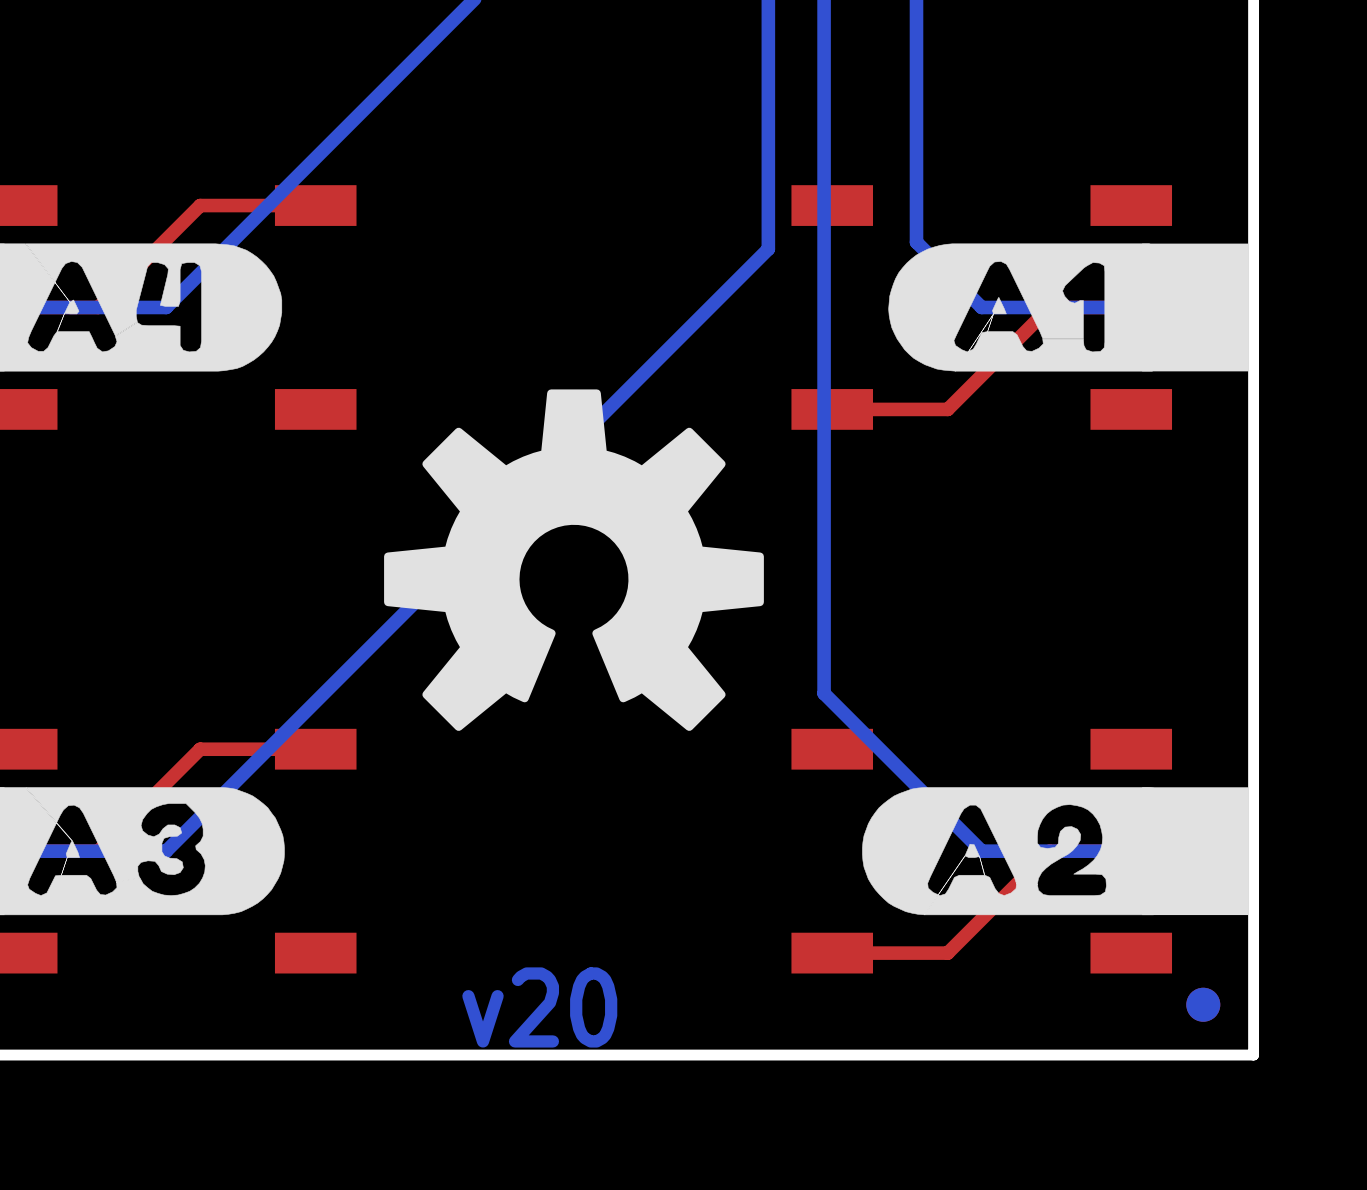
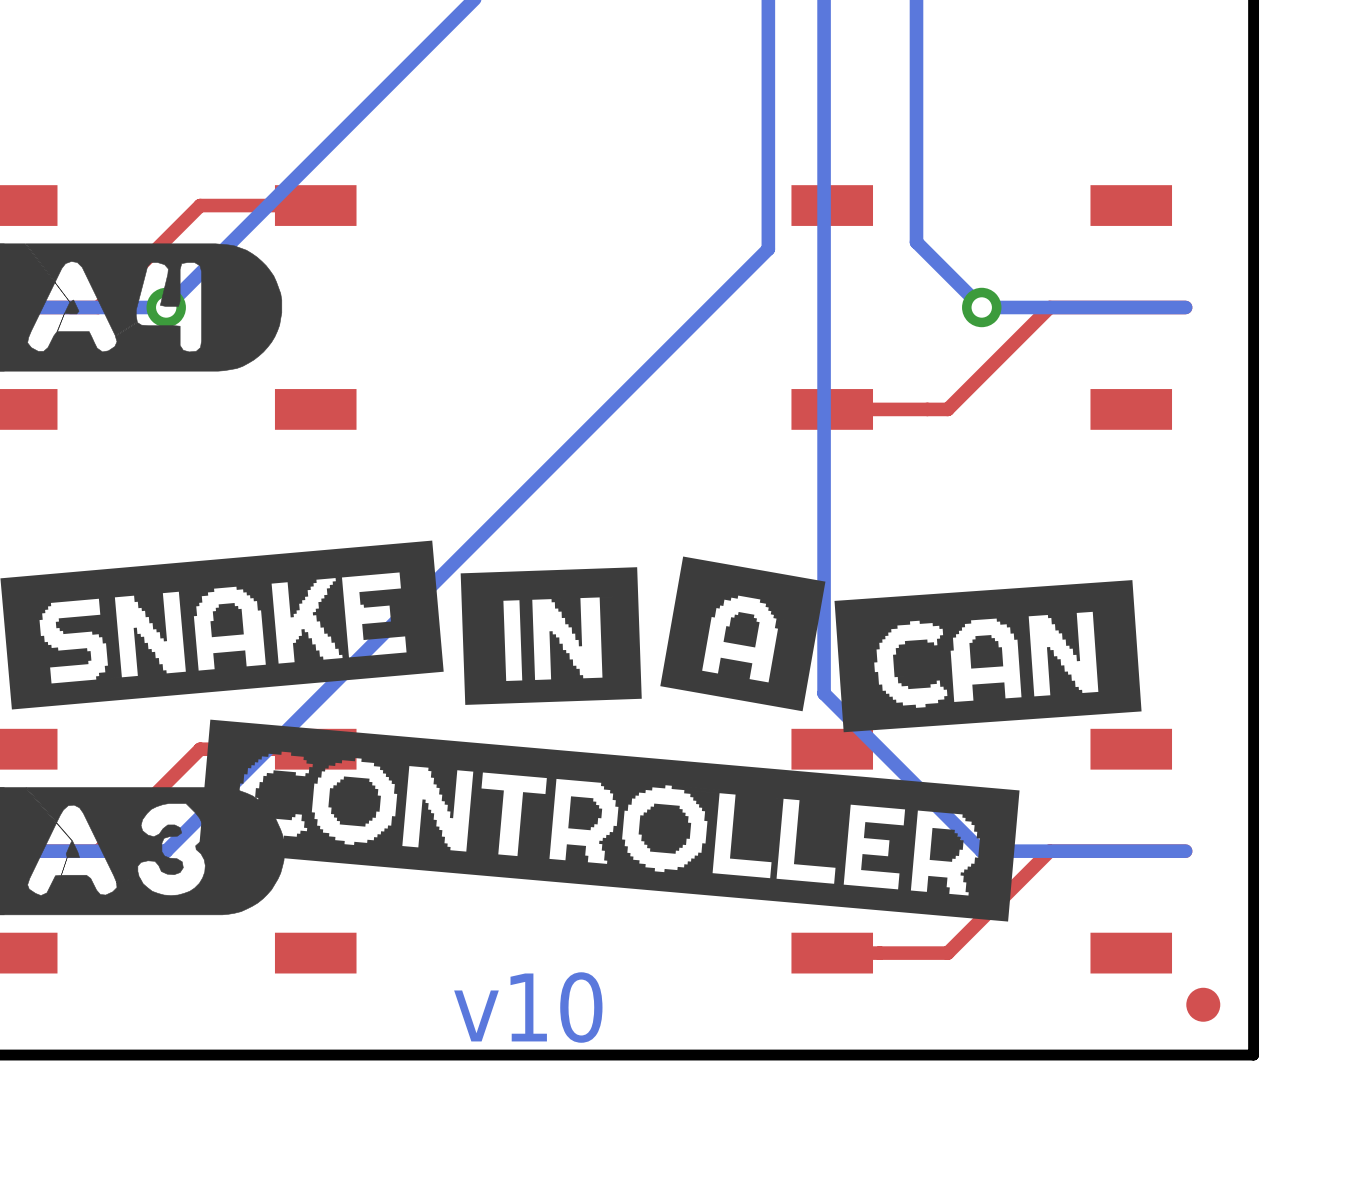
drawing: [888, 243, 1249, 372] -> none
via: none -> (166, 307)
via: none -> (981, 307)
drawing: [384, 389, 764, 731] -> none
drawing: none -> [0, 540, 1142, 922]
drawing: [862, 787, 1249, 916] -> none
part: (1203, 1004) -> none
text: v20 (539, 1007) -> v10 (528, 1007)

